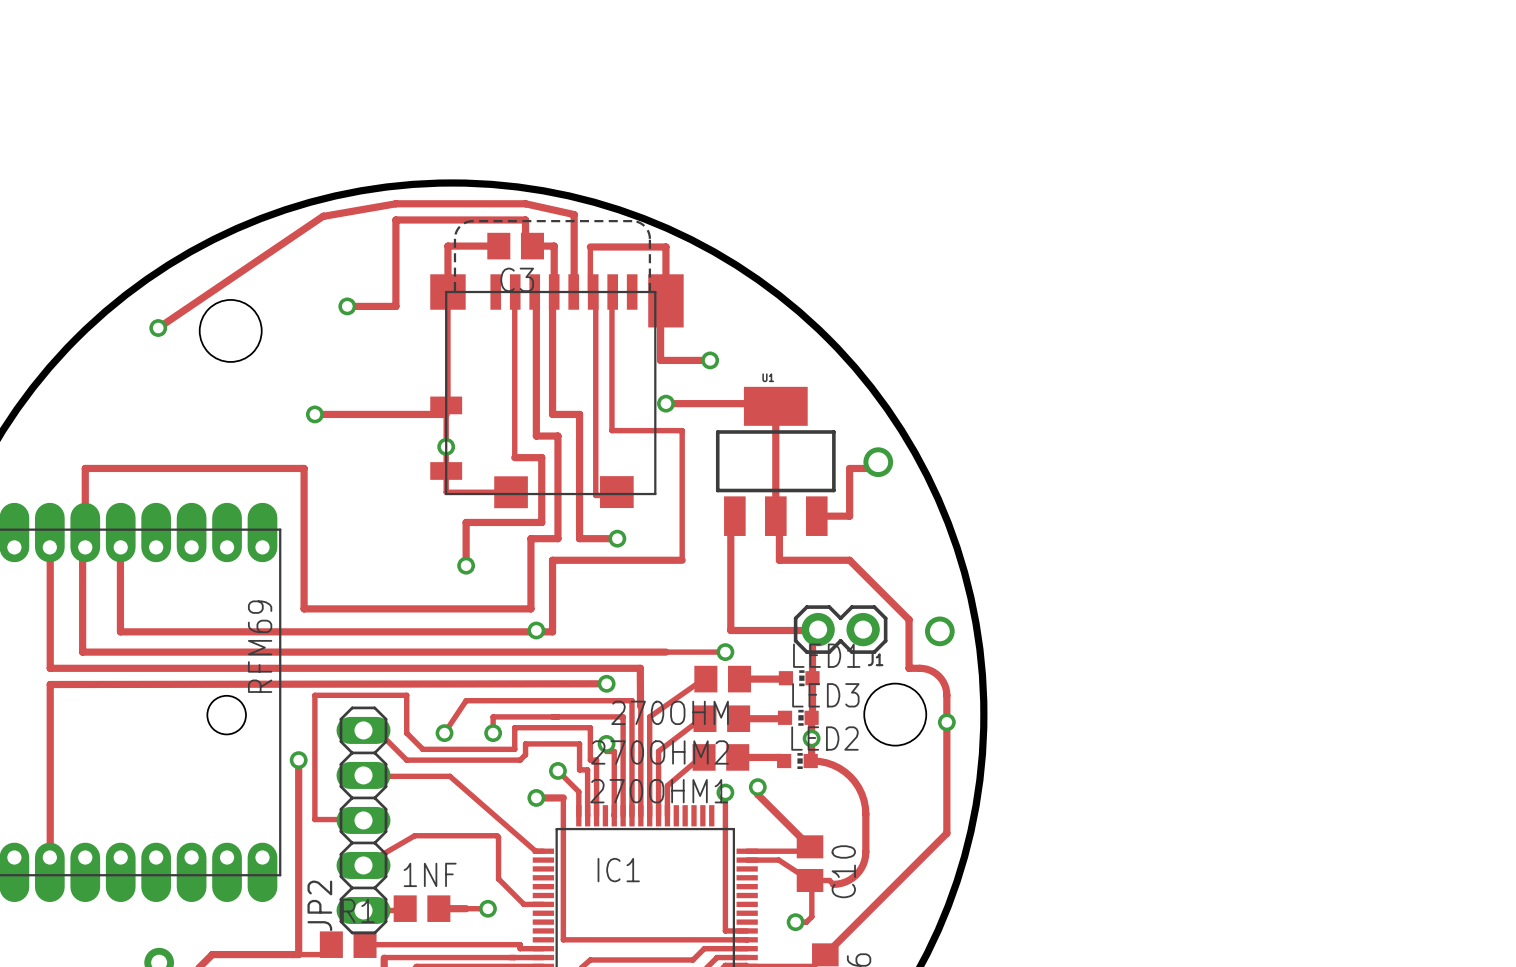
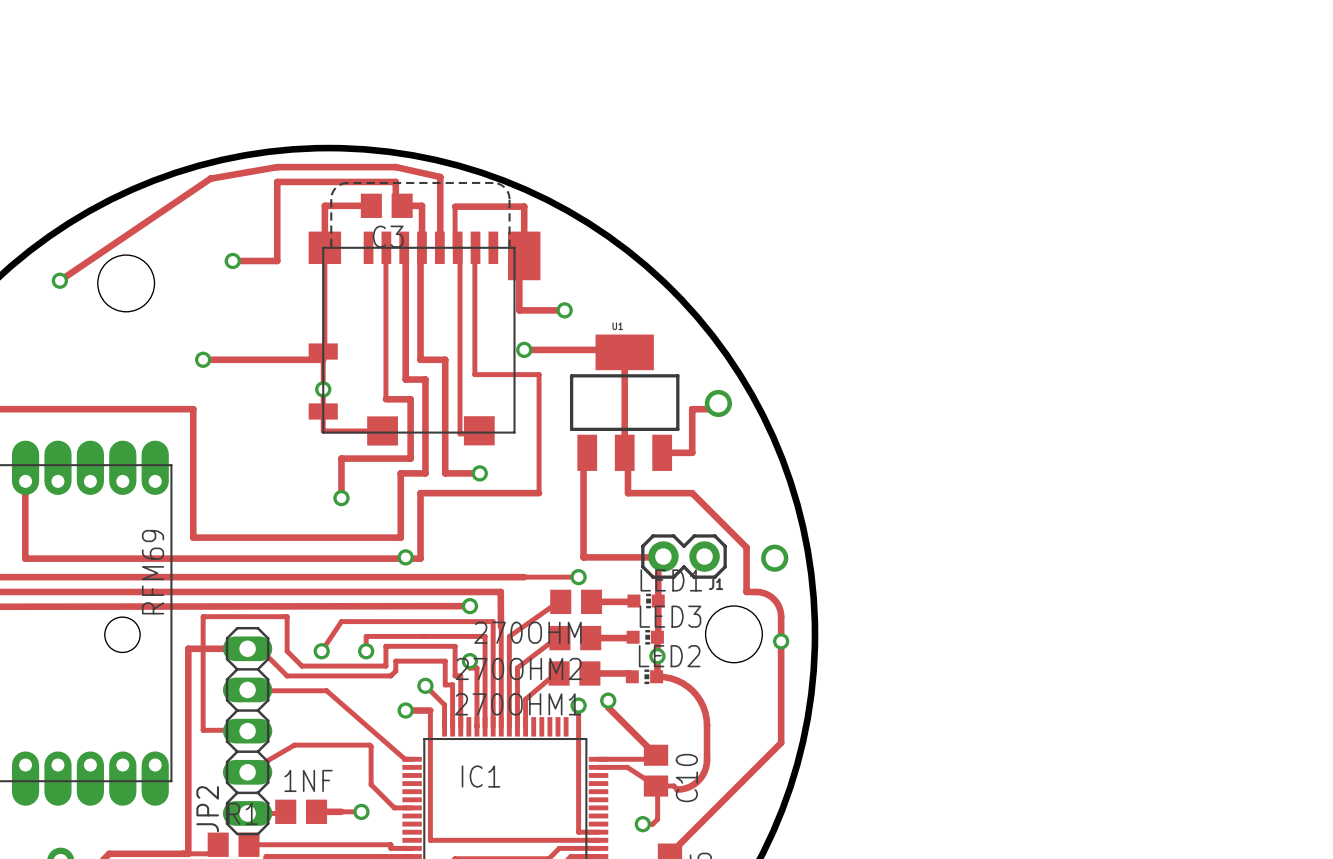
track: none -> (247, 648) (188, 648) (188, 675)
via: (298, 760) -> none

